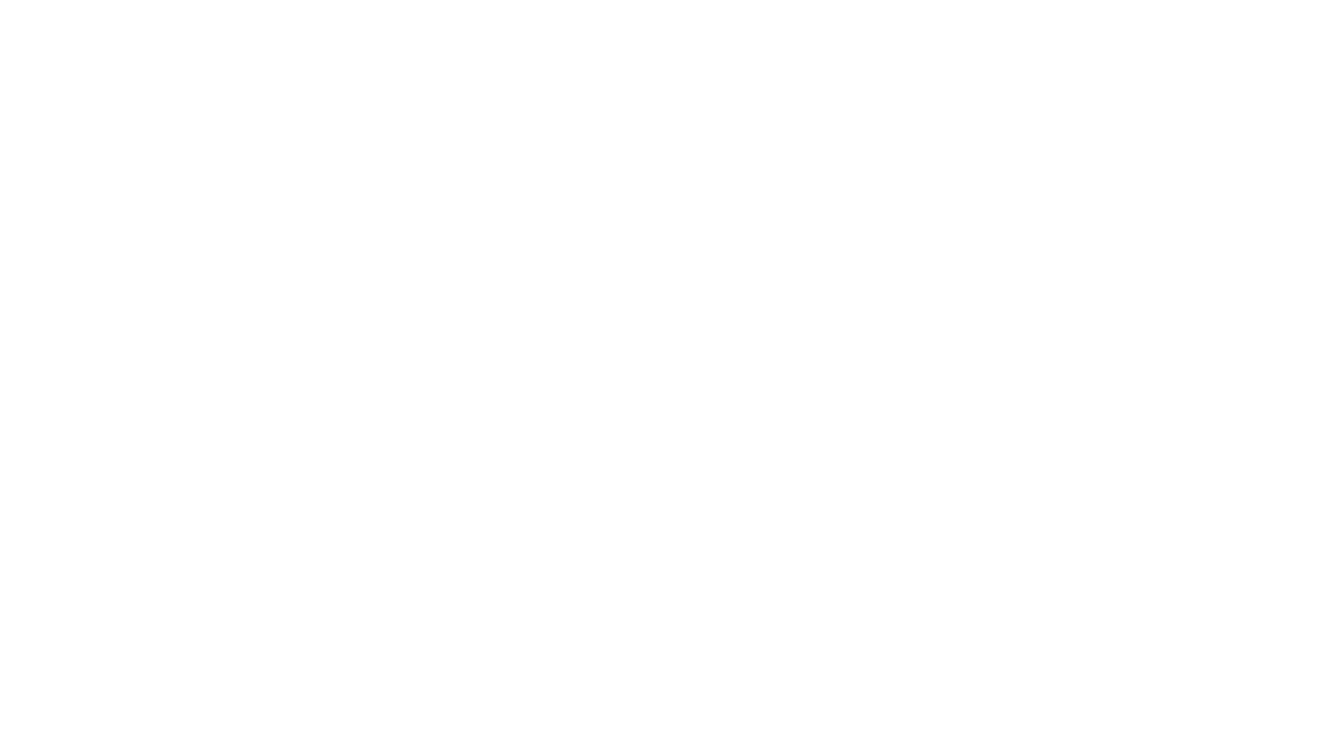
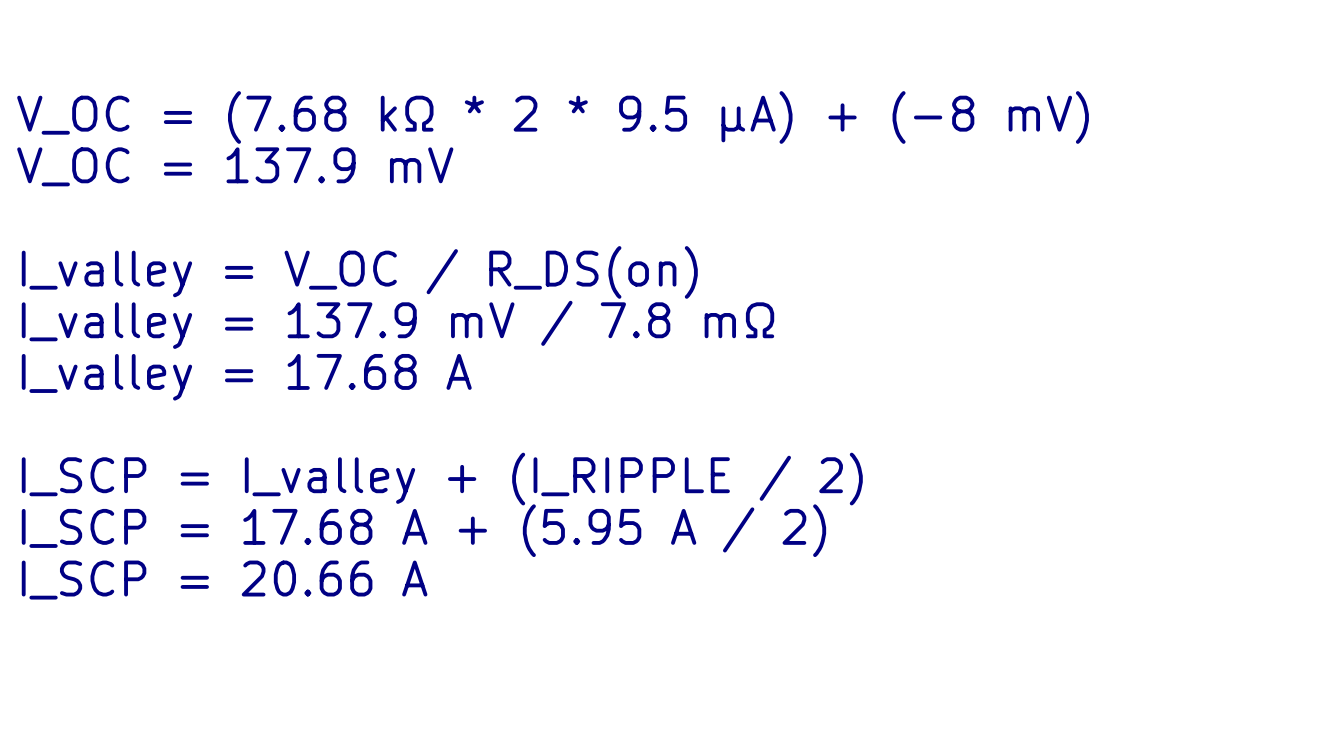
text: none -> V_OC = (7.68 kΩ * 2 * 9.5 µA) + (-8 mV) (553, 117)
text: none -> V_OC = 137.9 mV (235, 166)
text: none -> I_valley = V_OC / R_DS(on) (359, 272)
text: none -> I_valley = 137.9 mV / 7.8 mΩ (397, 324)
text: none -> I_valley = 17.68 A (246, 377)
text: none -> I_SCP = I_valley + (I_RIPPLE / 2) (442, 479)
text: none -> I_SCP = 17.68 A + (5.95 A / 2) (423, 530)
text: none -> I_SCP = 20.66 A (224, 580)

